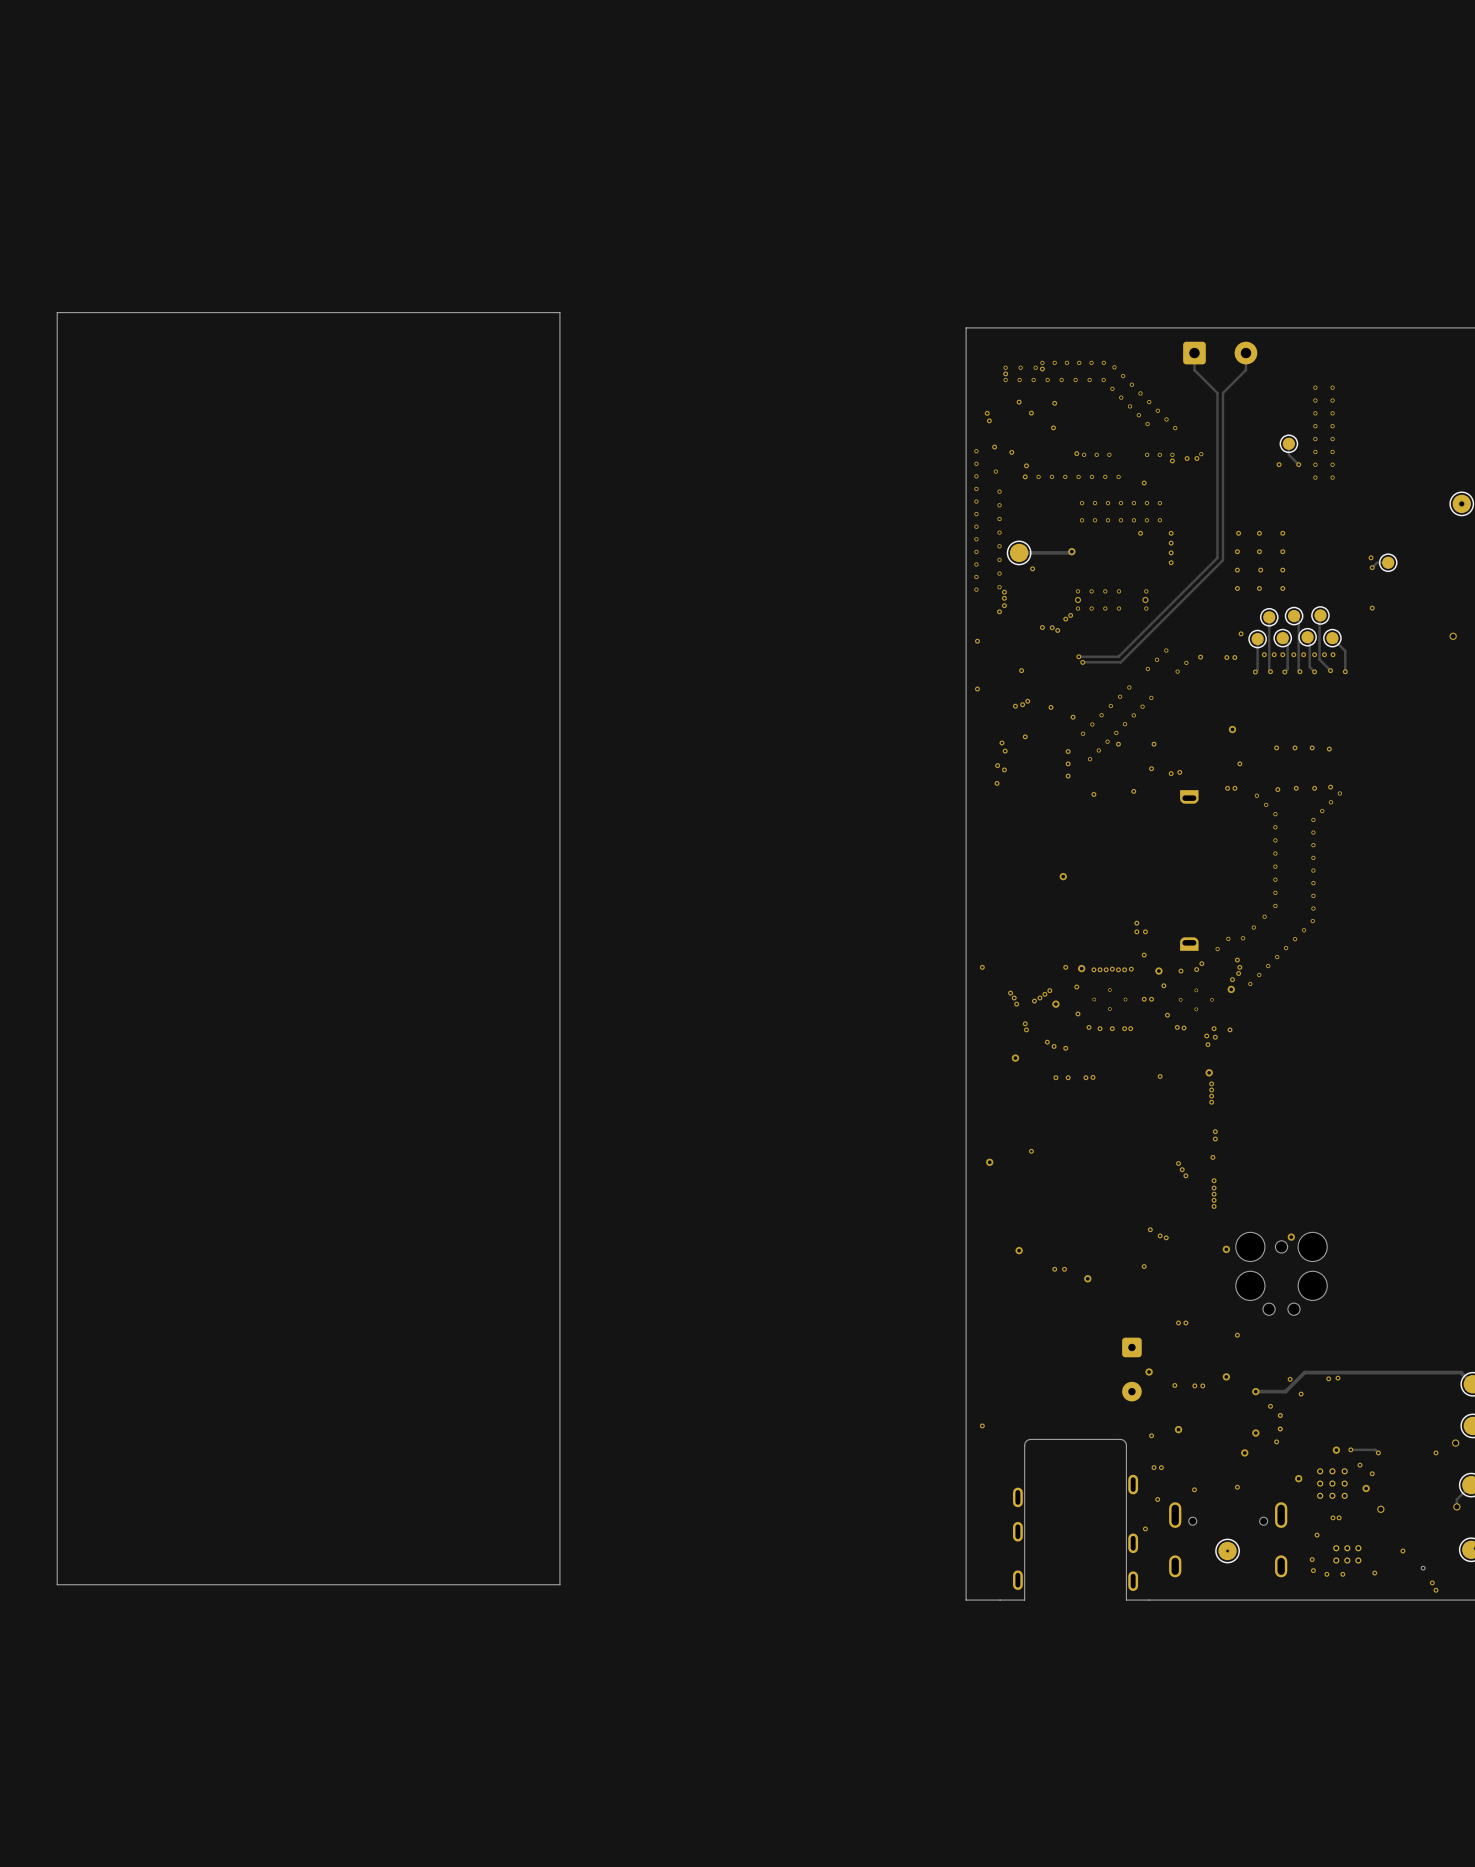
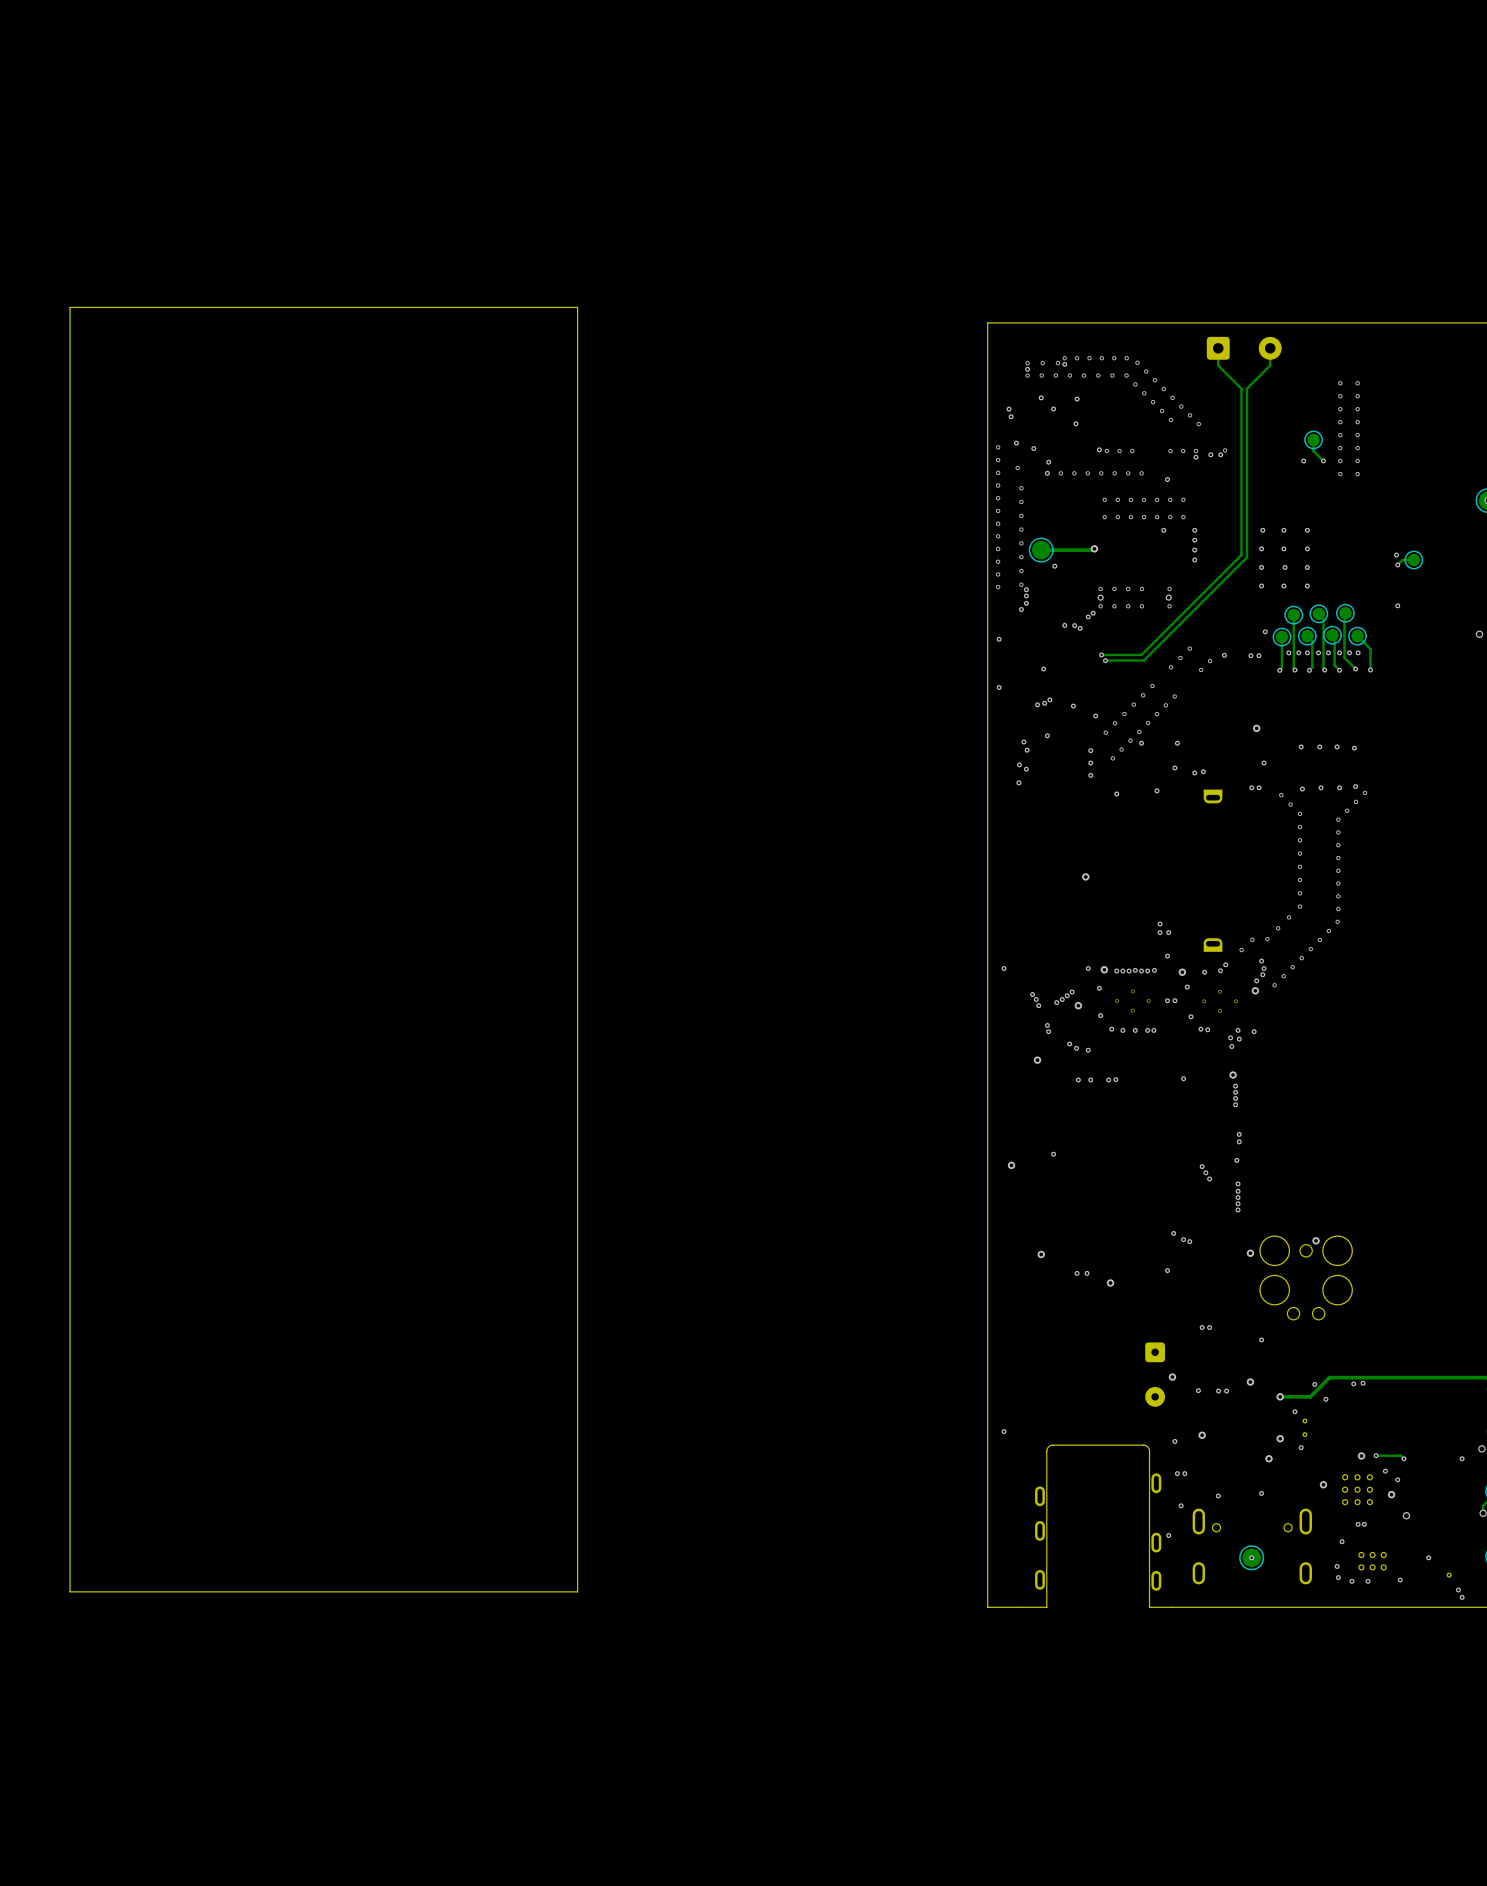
part footprint: [999, 1439, 1150, 1601] -> [1021, 1444, 1173, 1608]

